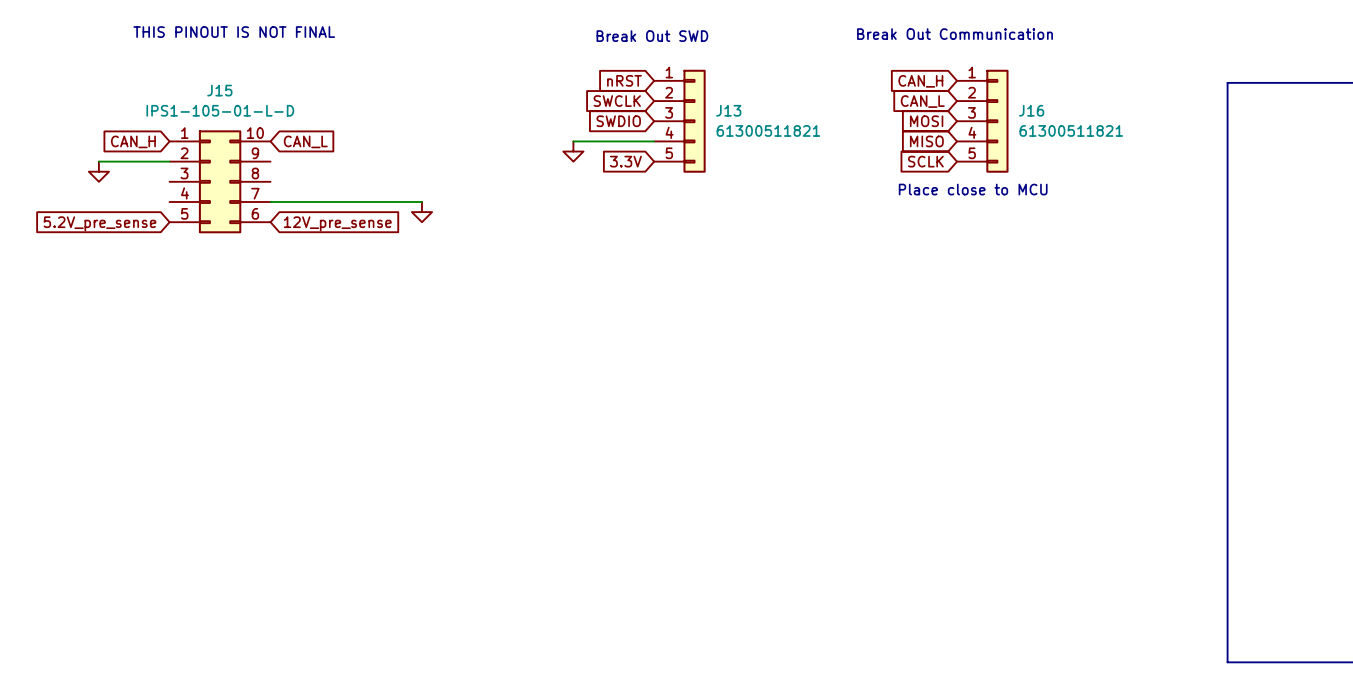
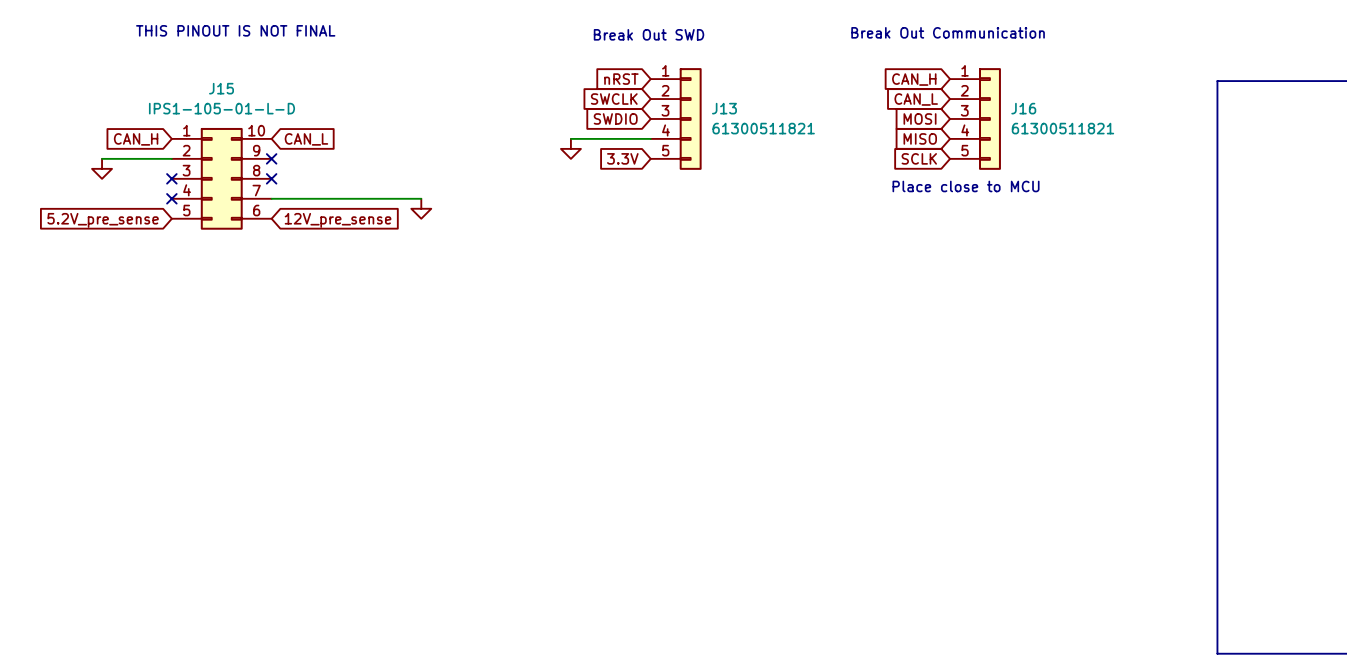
no-connect mark: none -> (271, 158)
no-connect mark: none -> (171, 178)
no-connect mark: none -> (271, 178)
no-connect mark: none -> (171, 198)

